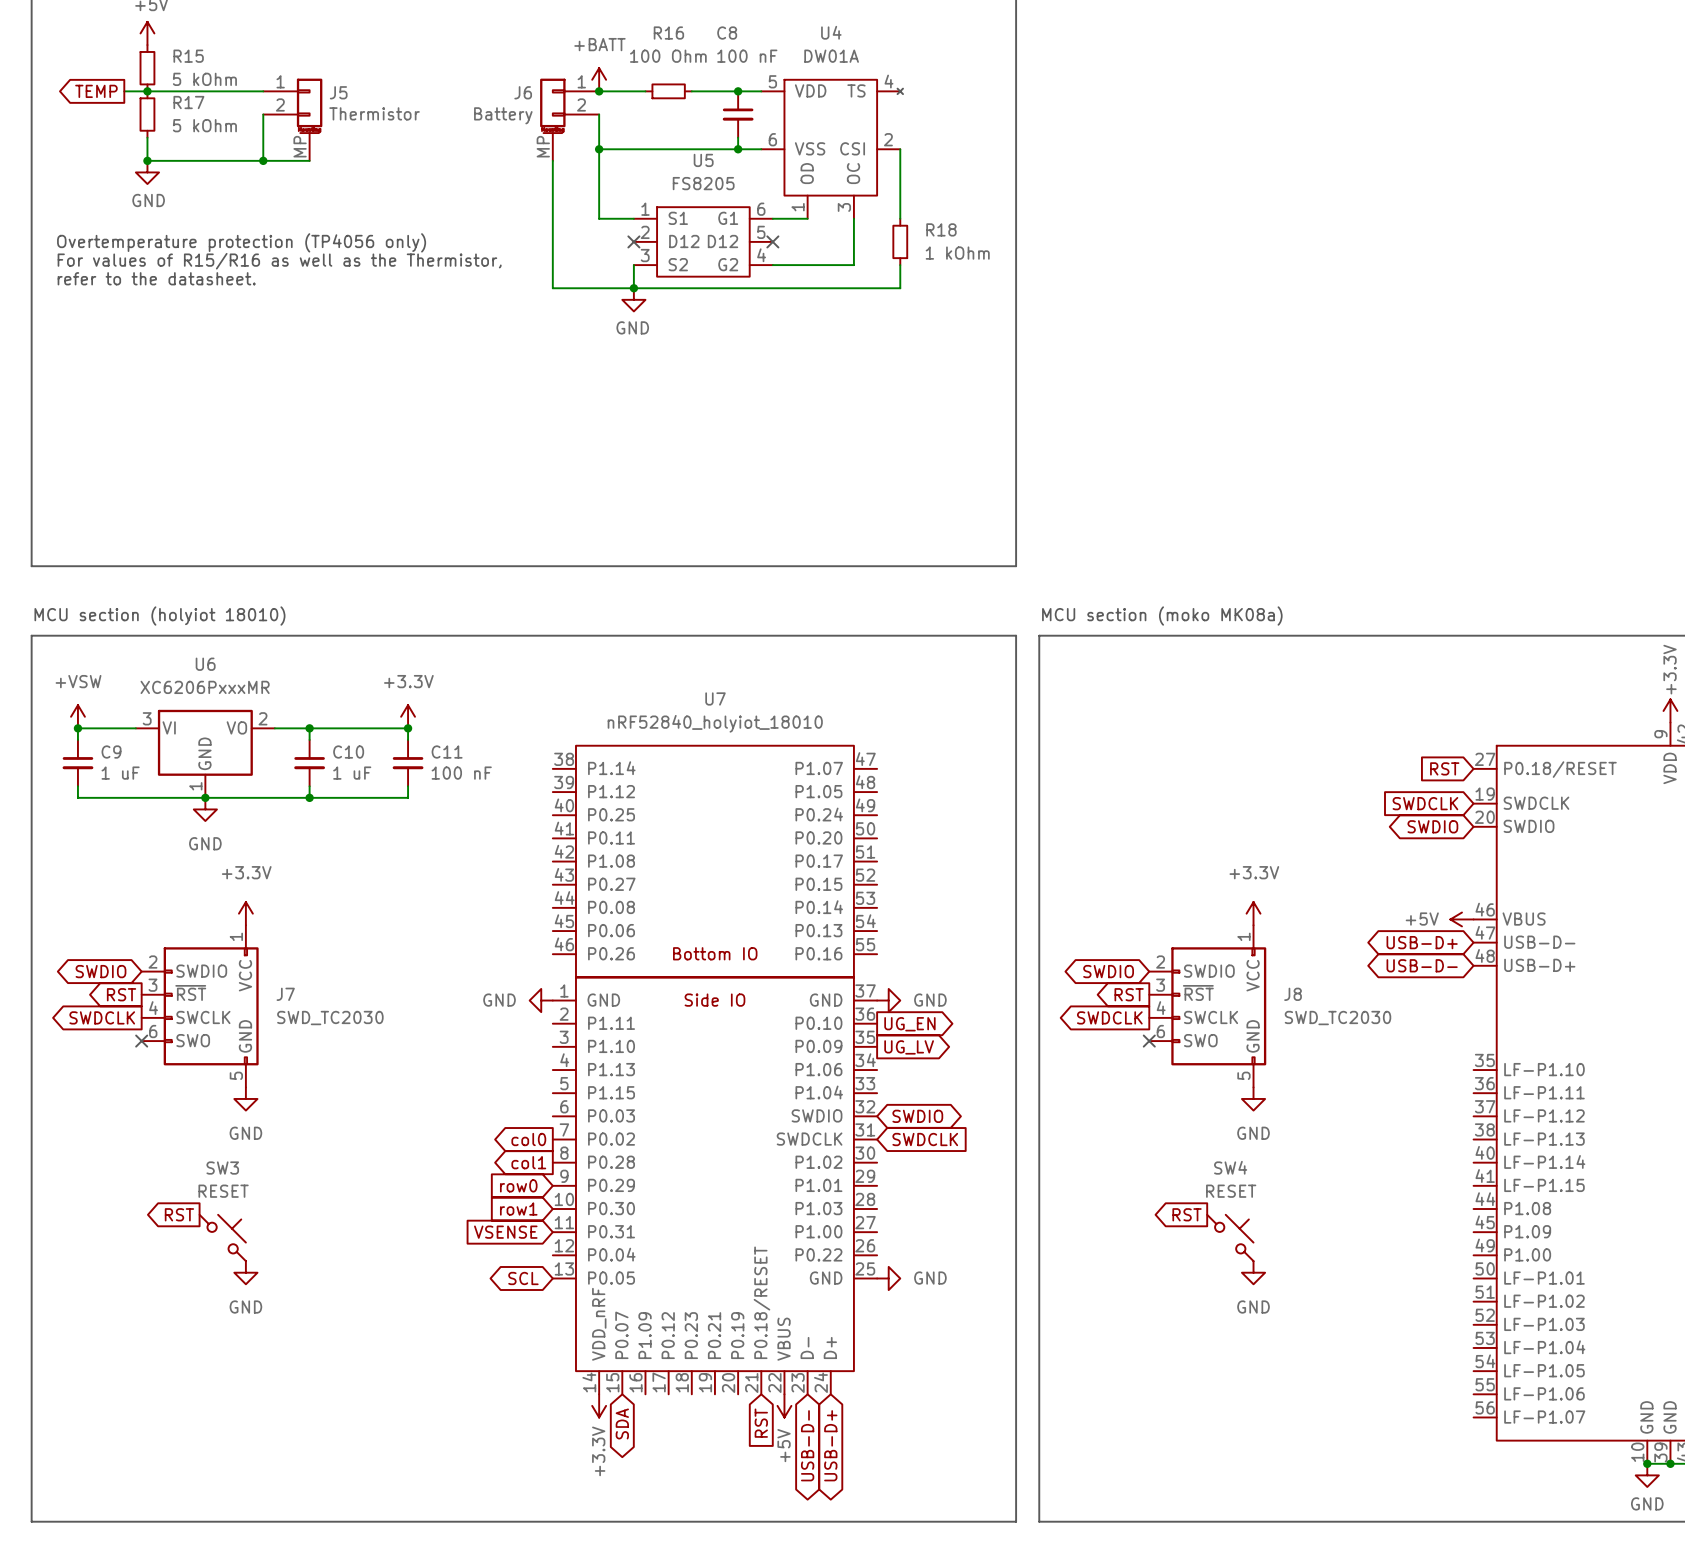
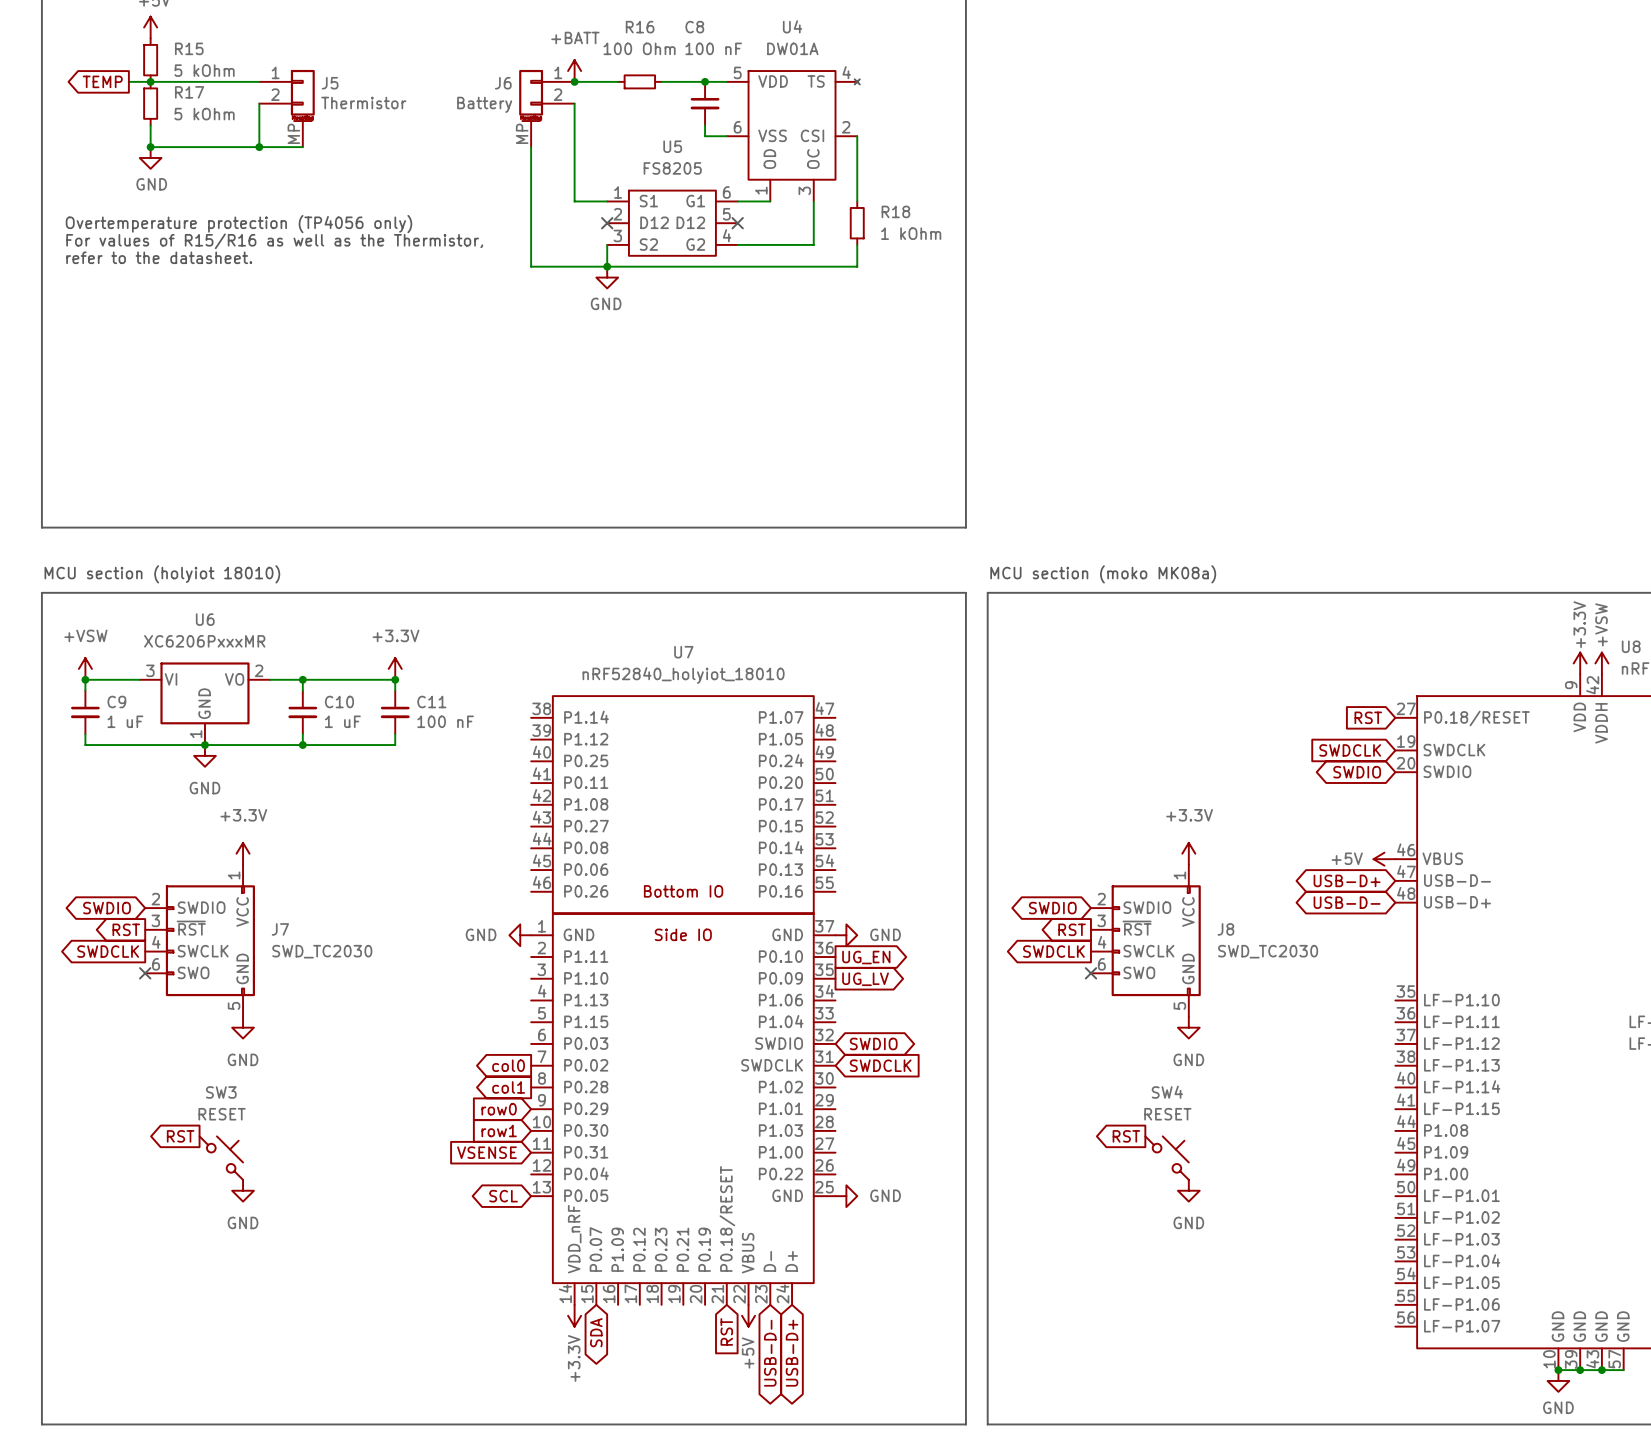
wire: (599, 149) (738, 149) -> none
junction: (599, 149) -> none
junction: (738, 149) -> none

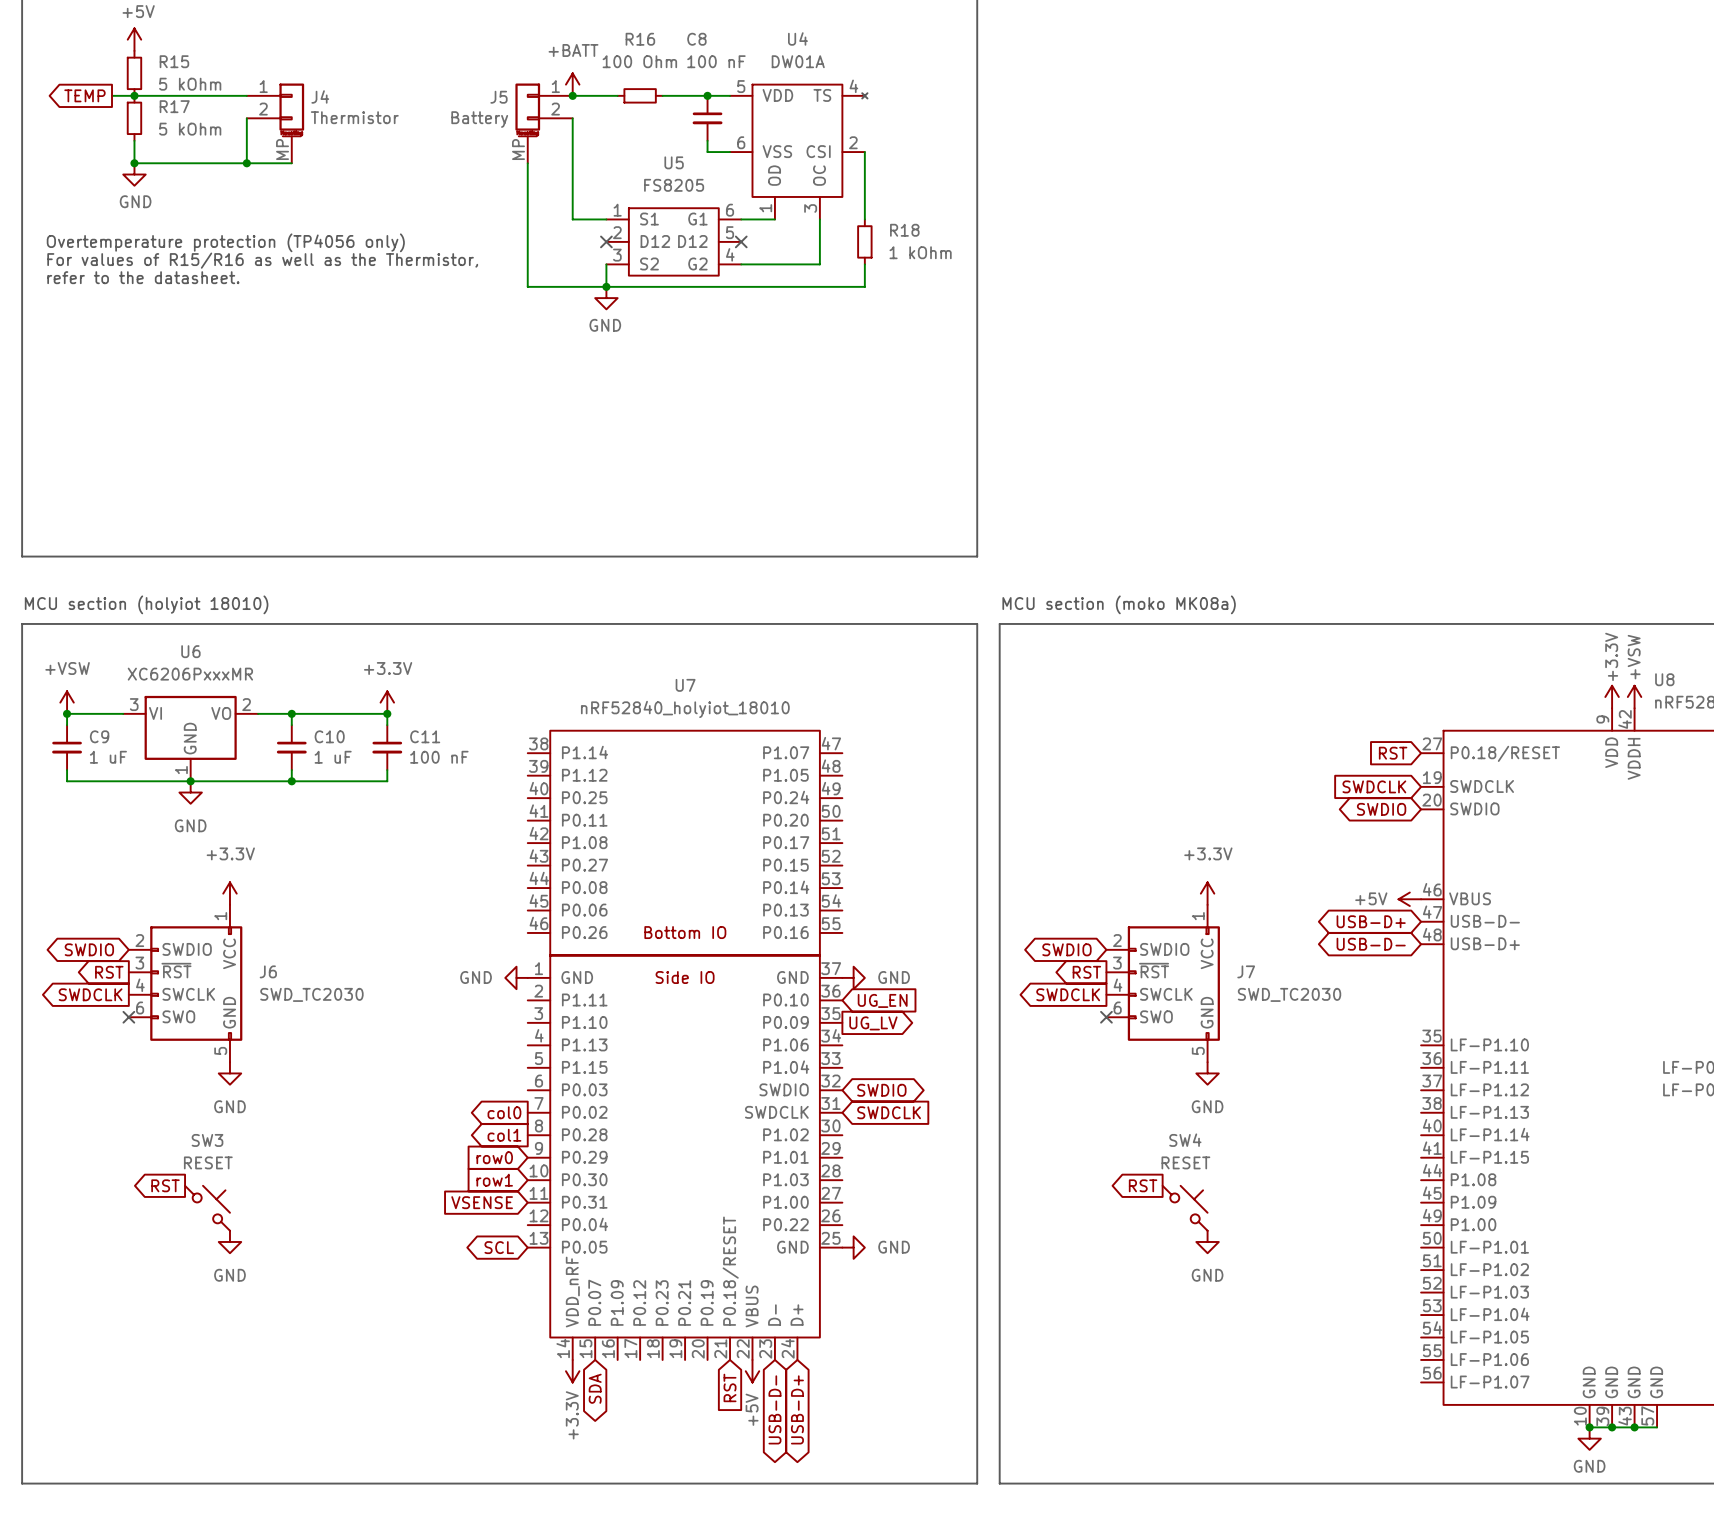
J5 name: J5 (330, 83) -> J4 (320, 96)
J6 name: J6 (503, 83) -> J5 (498, 97)
J7 name: J7 (280, 929) -> J6 (268, 971)
J8 name: J8 (1225, 929) -> J7 (1246, 971)
global label shape: output (866, 957) -> input (882, 1000)

